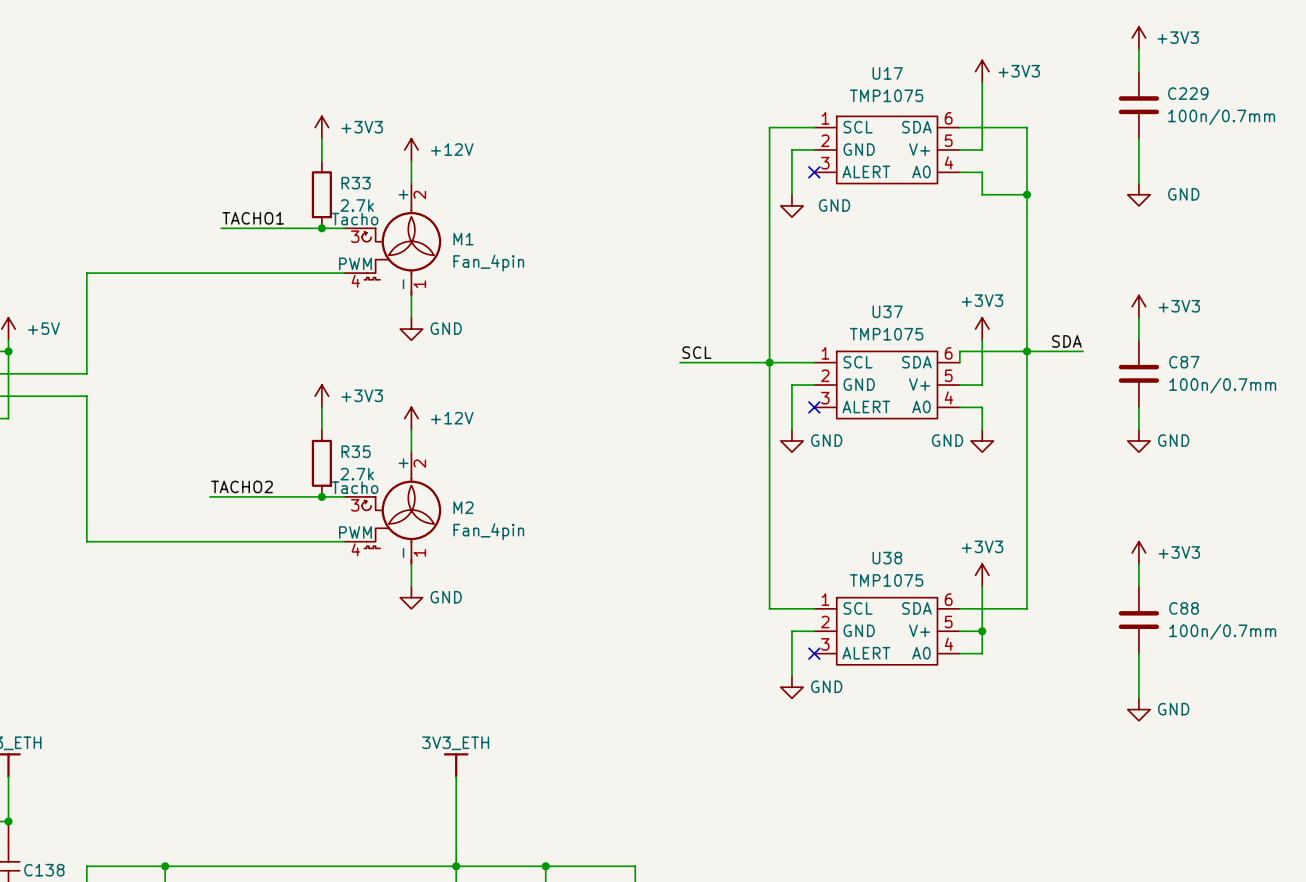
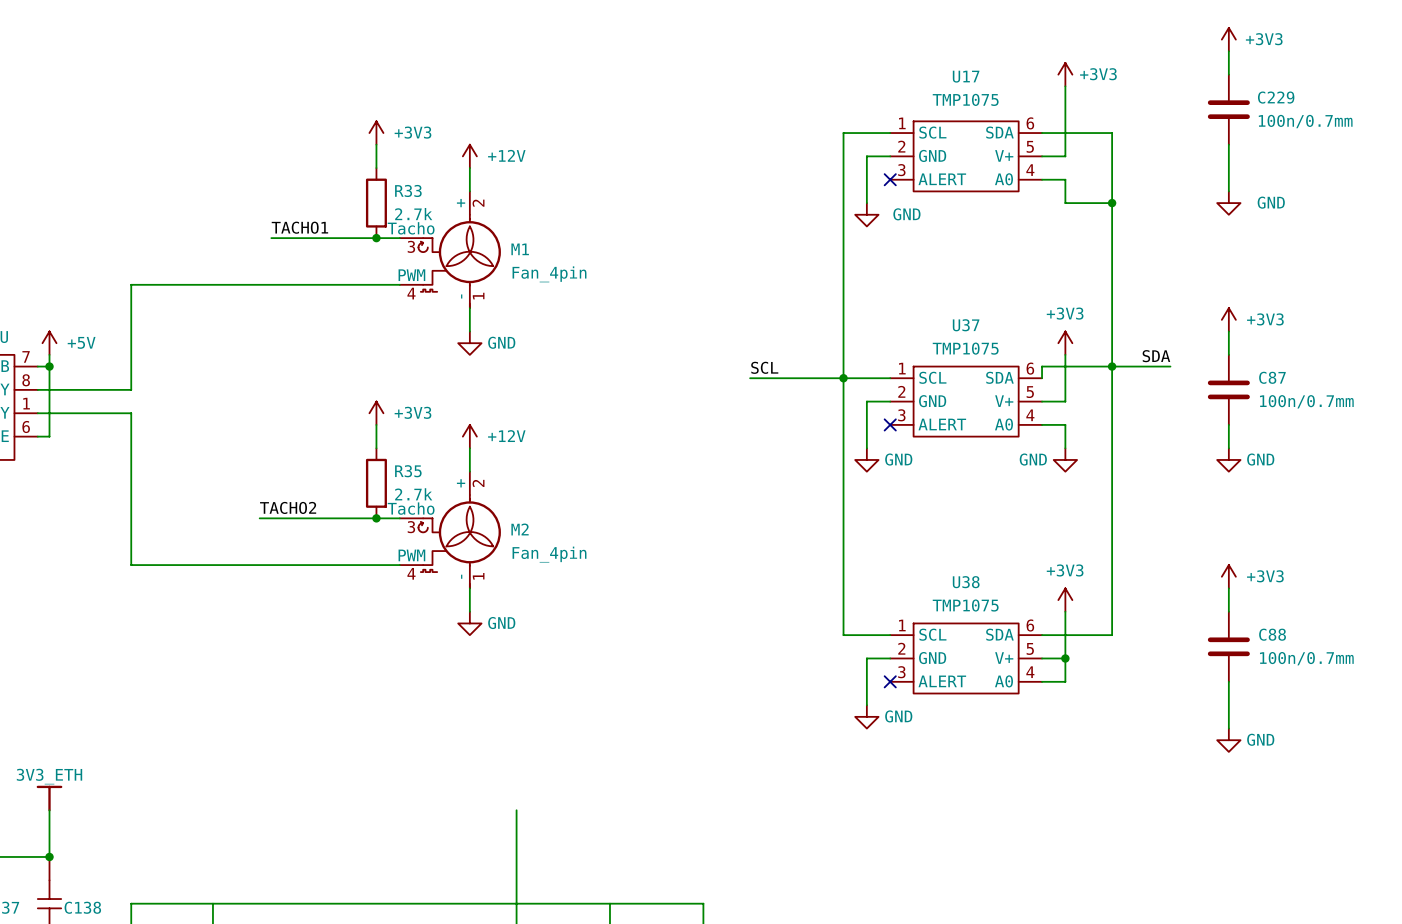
power symbol: 3V3_ETH (456, 765) -> none
junction: (165, 866) -> none
junction: (456, 866) -> none
junction: (545, 866) -> none

